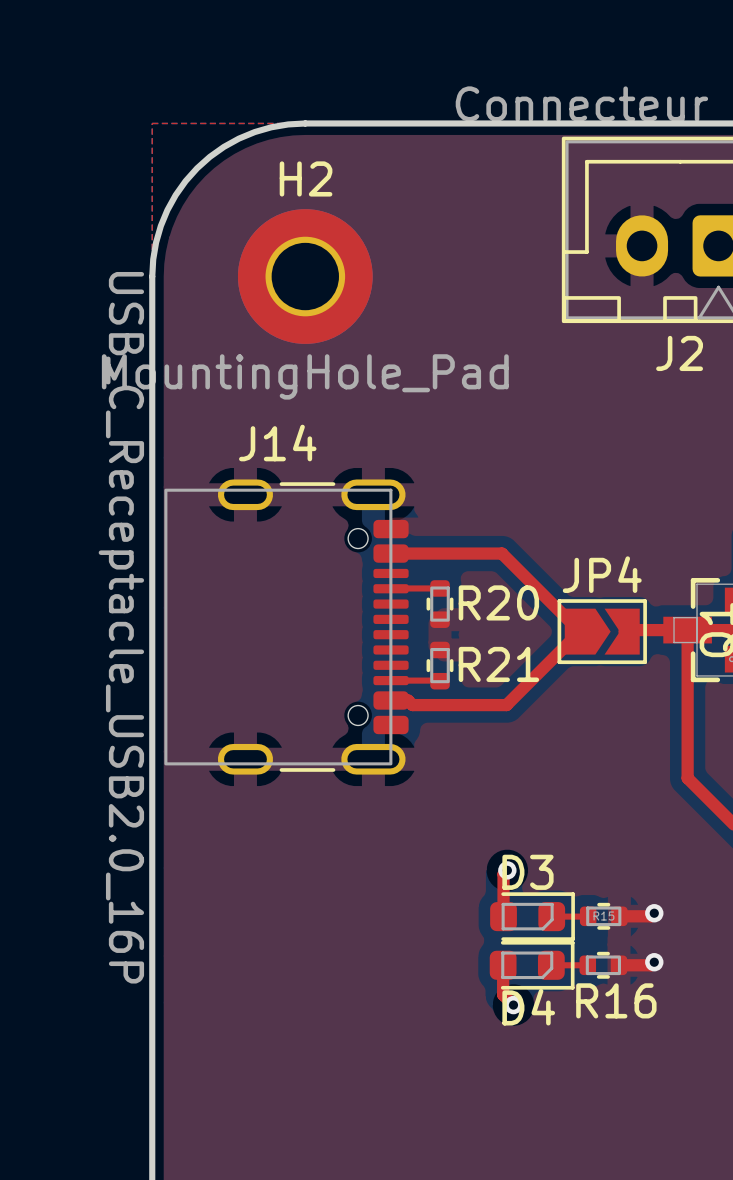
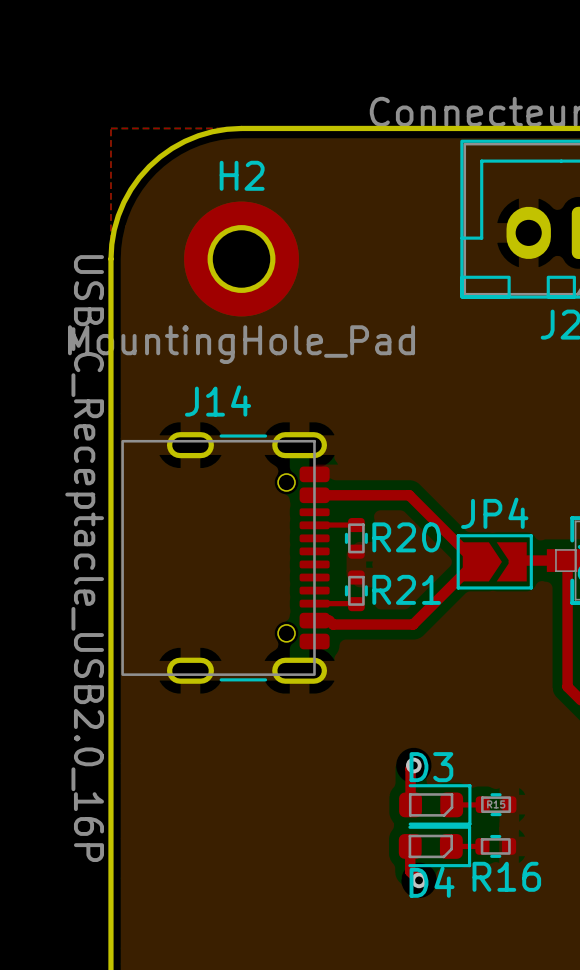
top track: (654, 913) (651, 916) (619, 916) -> none
via: (654, 913) -> none
top track: (654, 962) (651, 965) (619, 965) -> none
via: (654, 962) -> none

